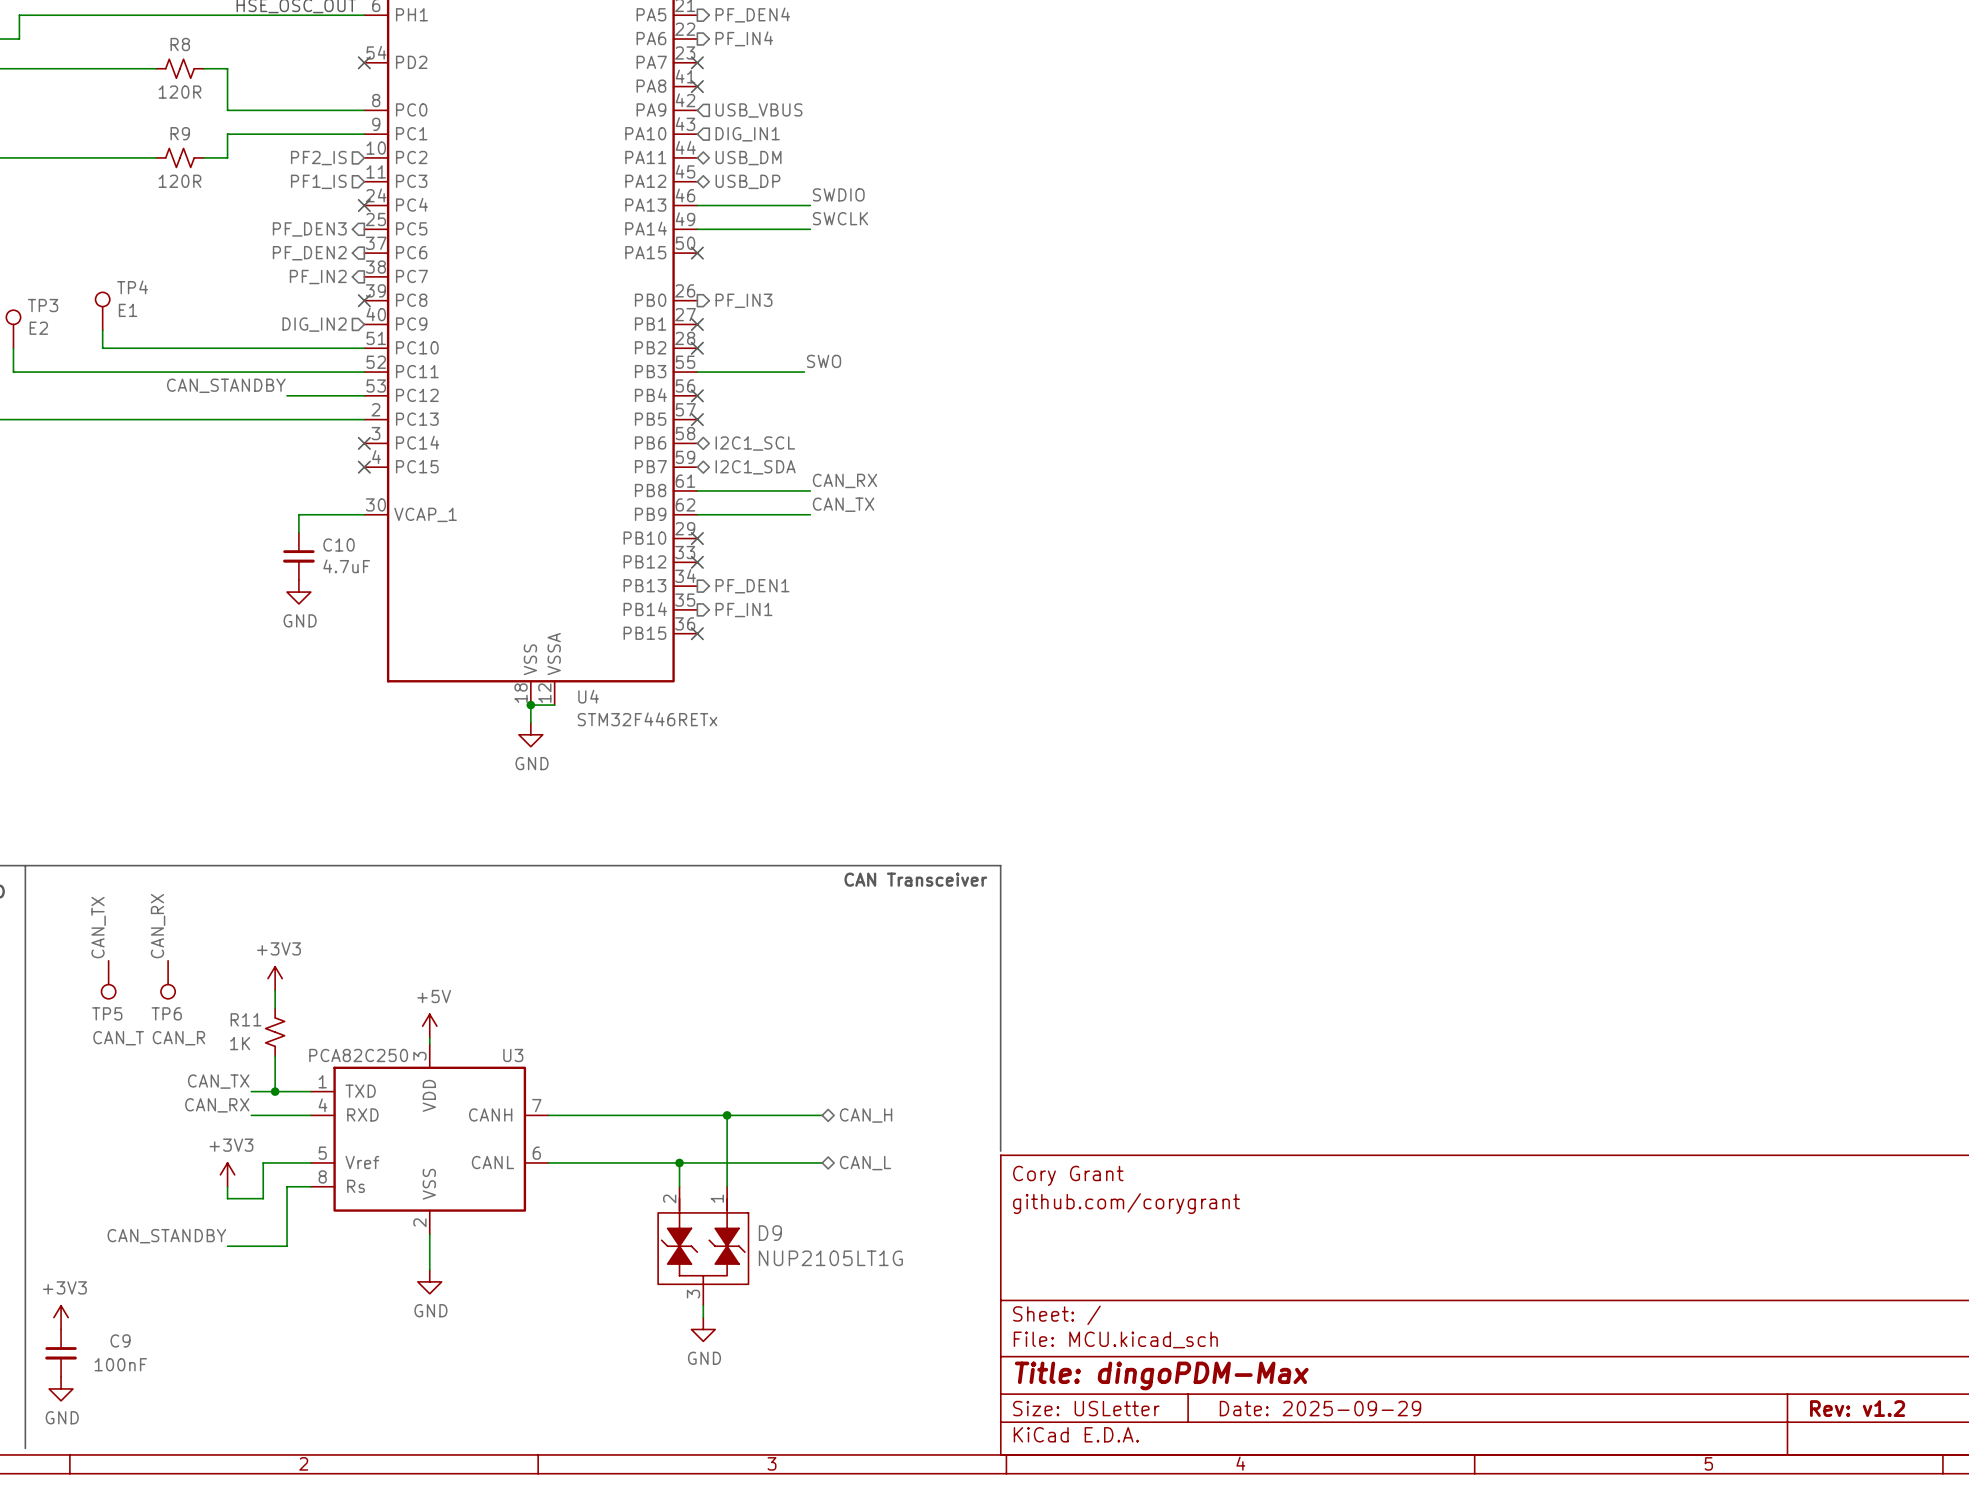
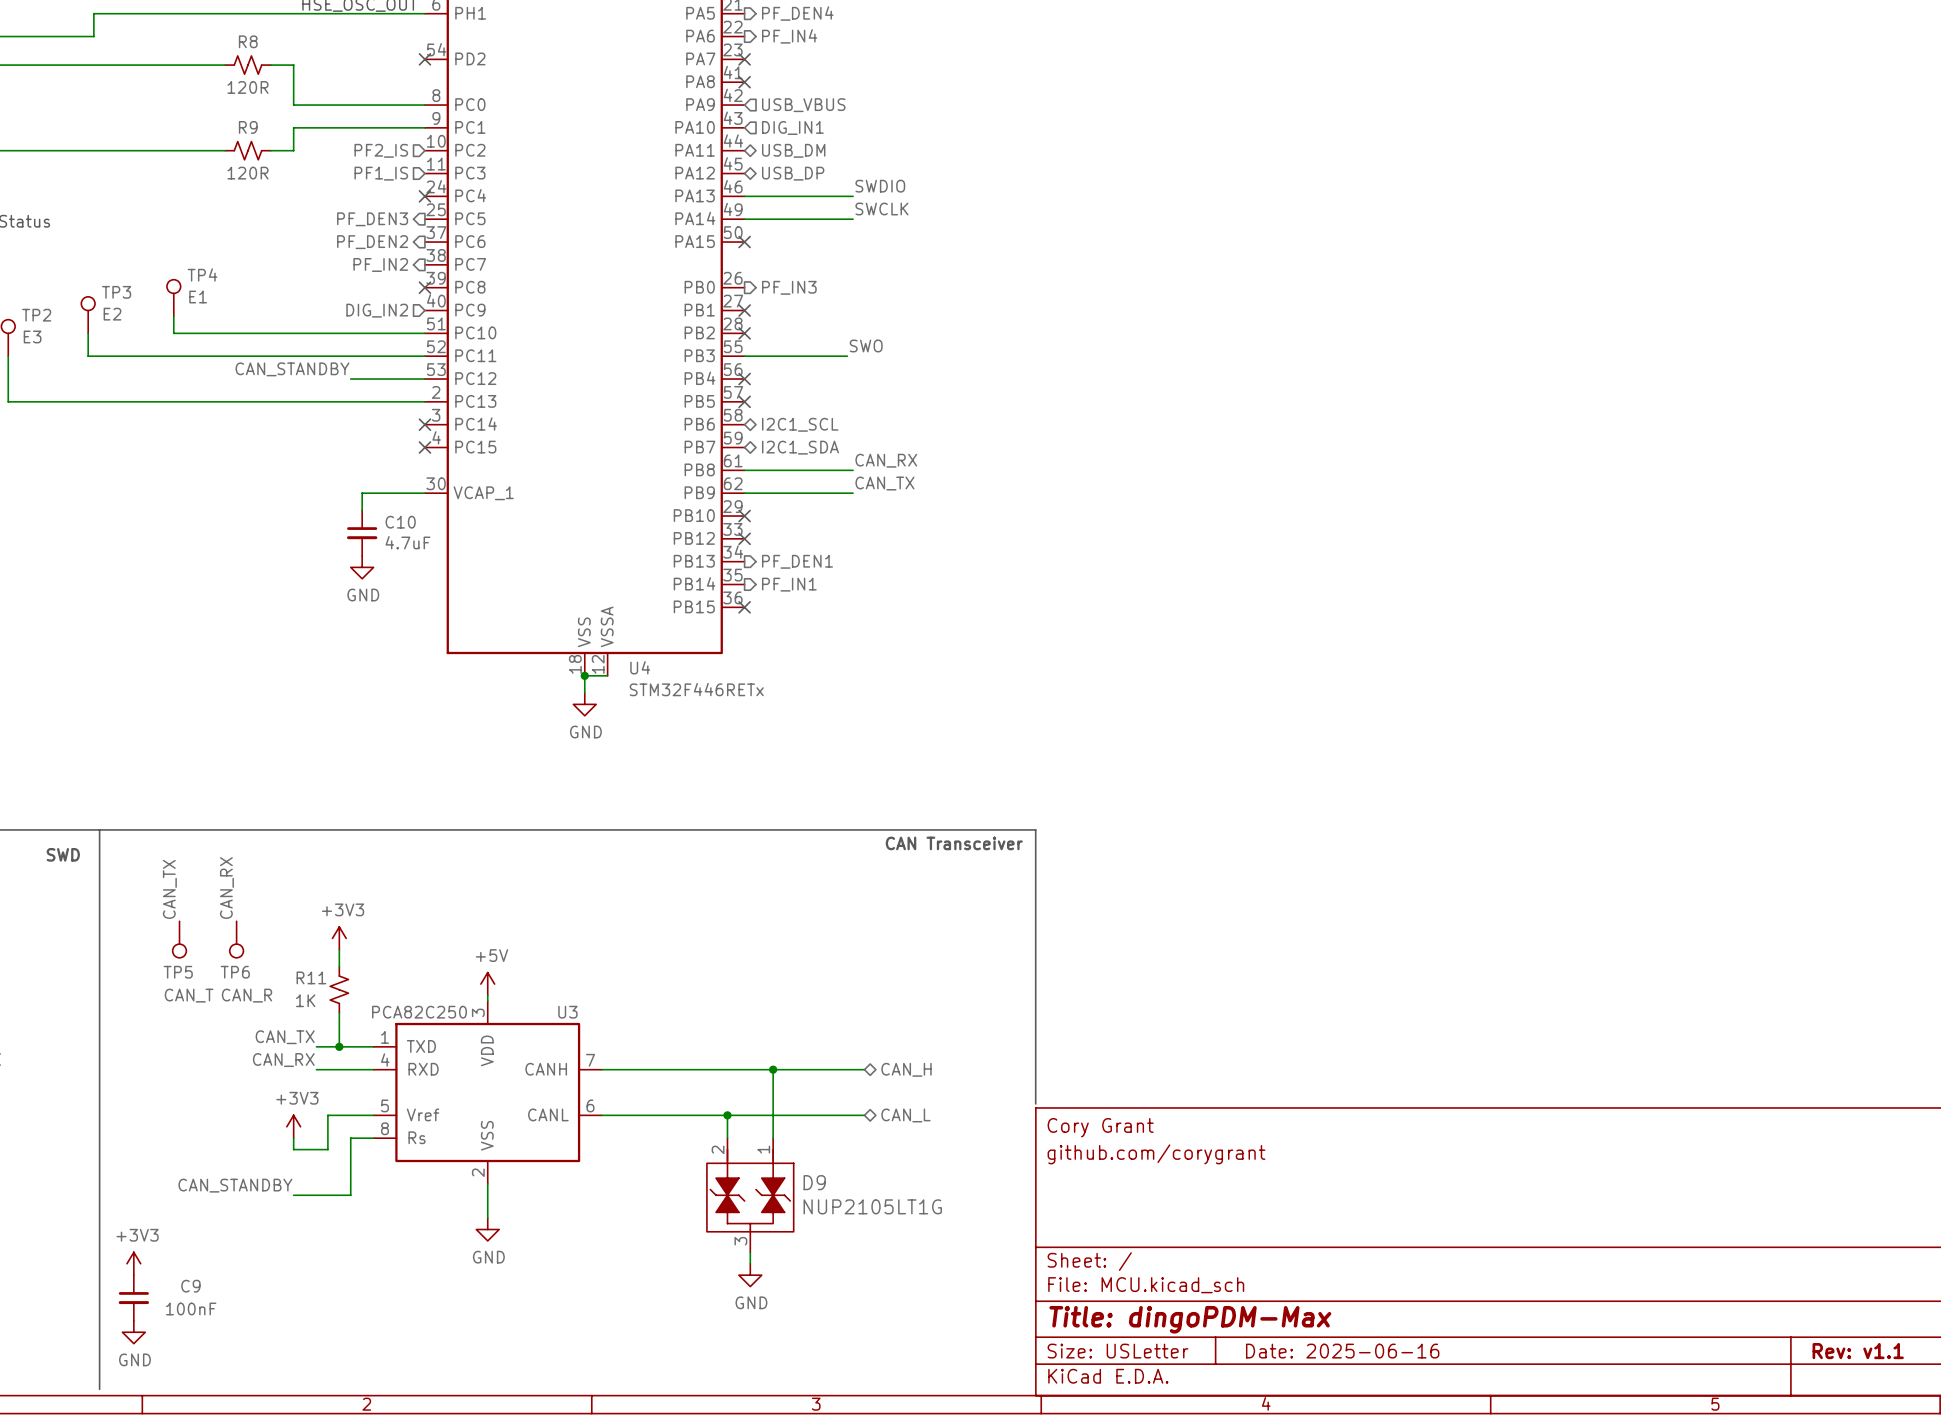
title block: Date: 2025-09-29 (1320, 1408) -> Date: 2025-06-16 (1342, 1351)
title block: Rev: v1.2 (1857, 1408) -> Rev: v1.1 (1858, 1351)

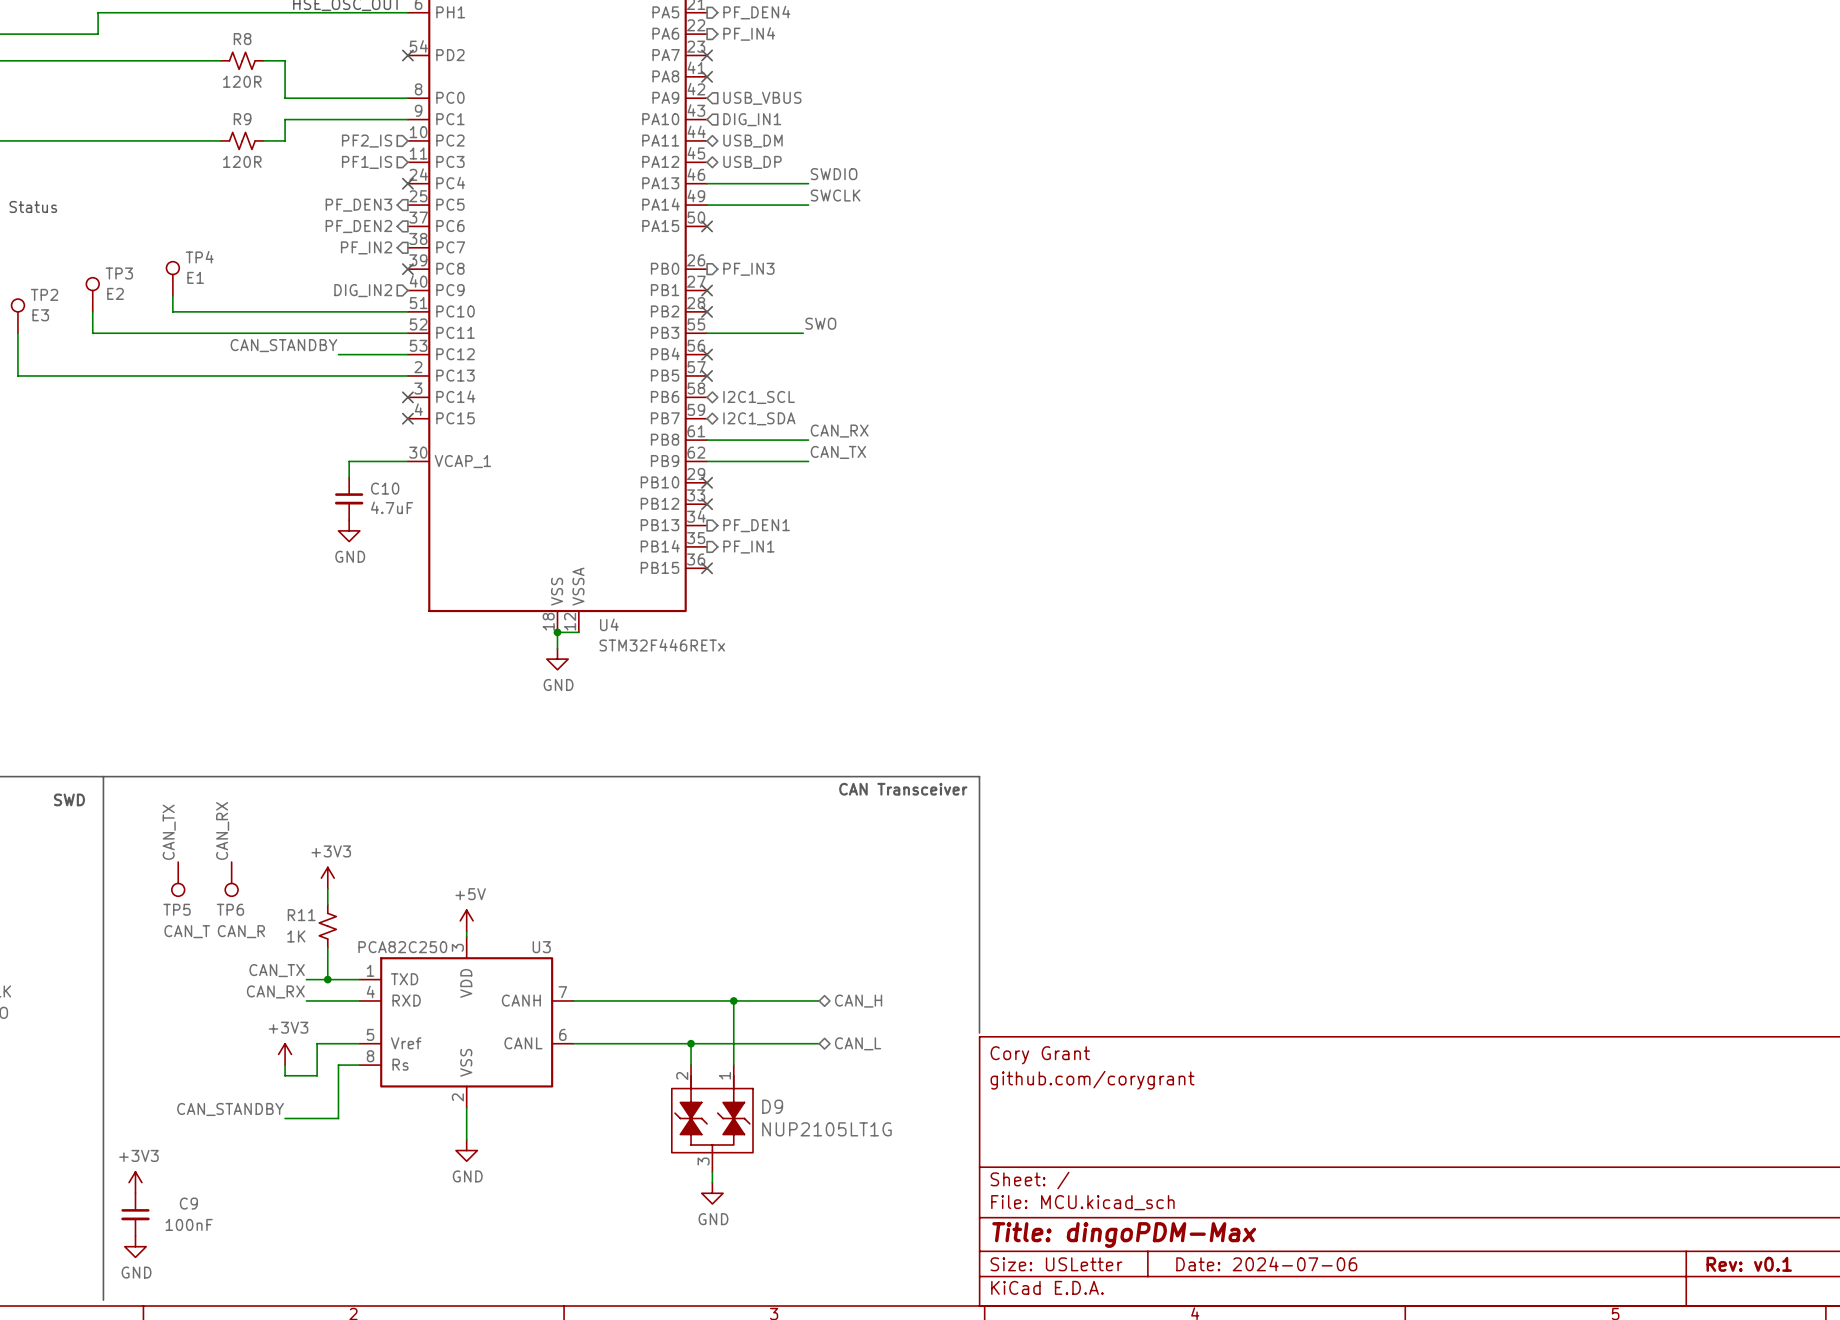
title block: Date: 2025-06-16 (1342, 1351) -> Date: 2024-07-06 (1266, 1264)
title block: Rev: v1.1 (1858, 1351) -> Rev: v0.1 (1749, 1264)

